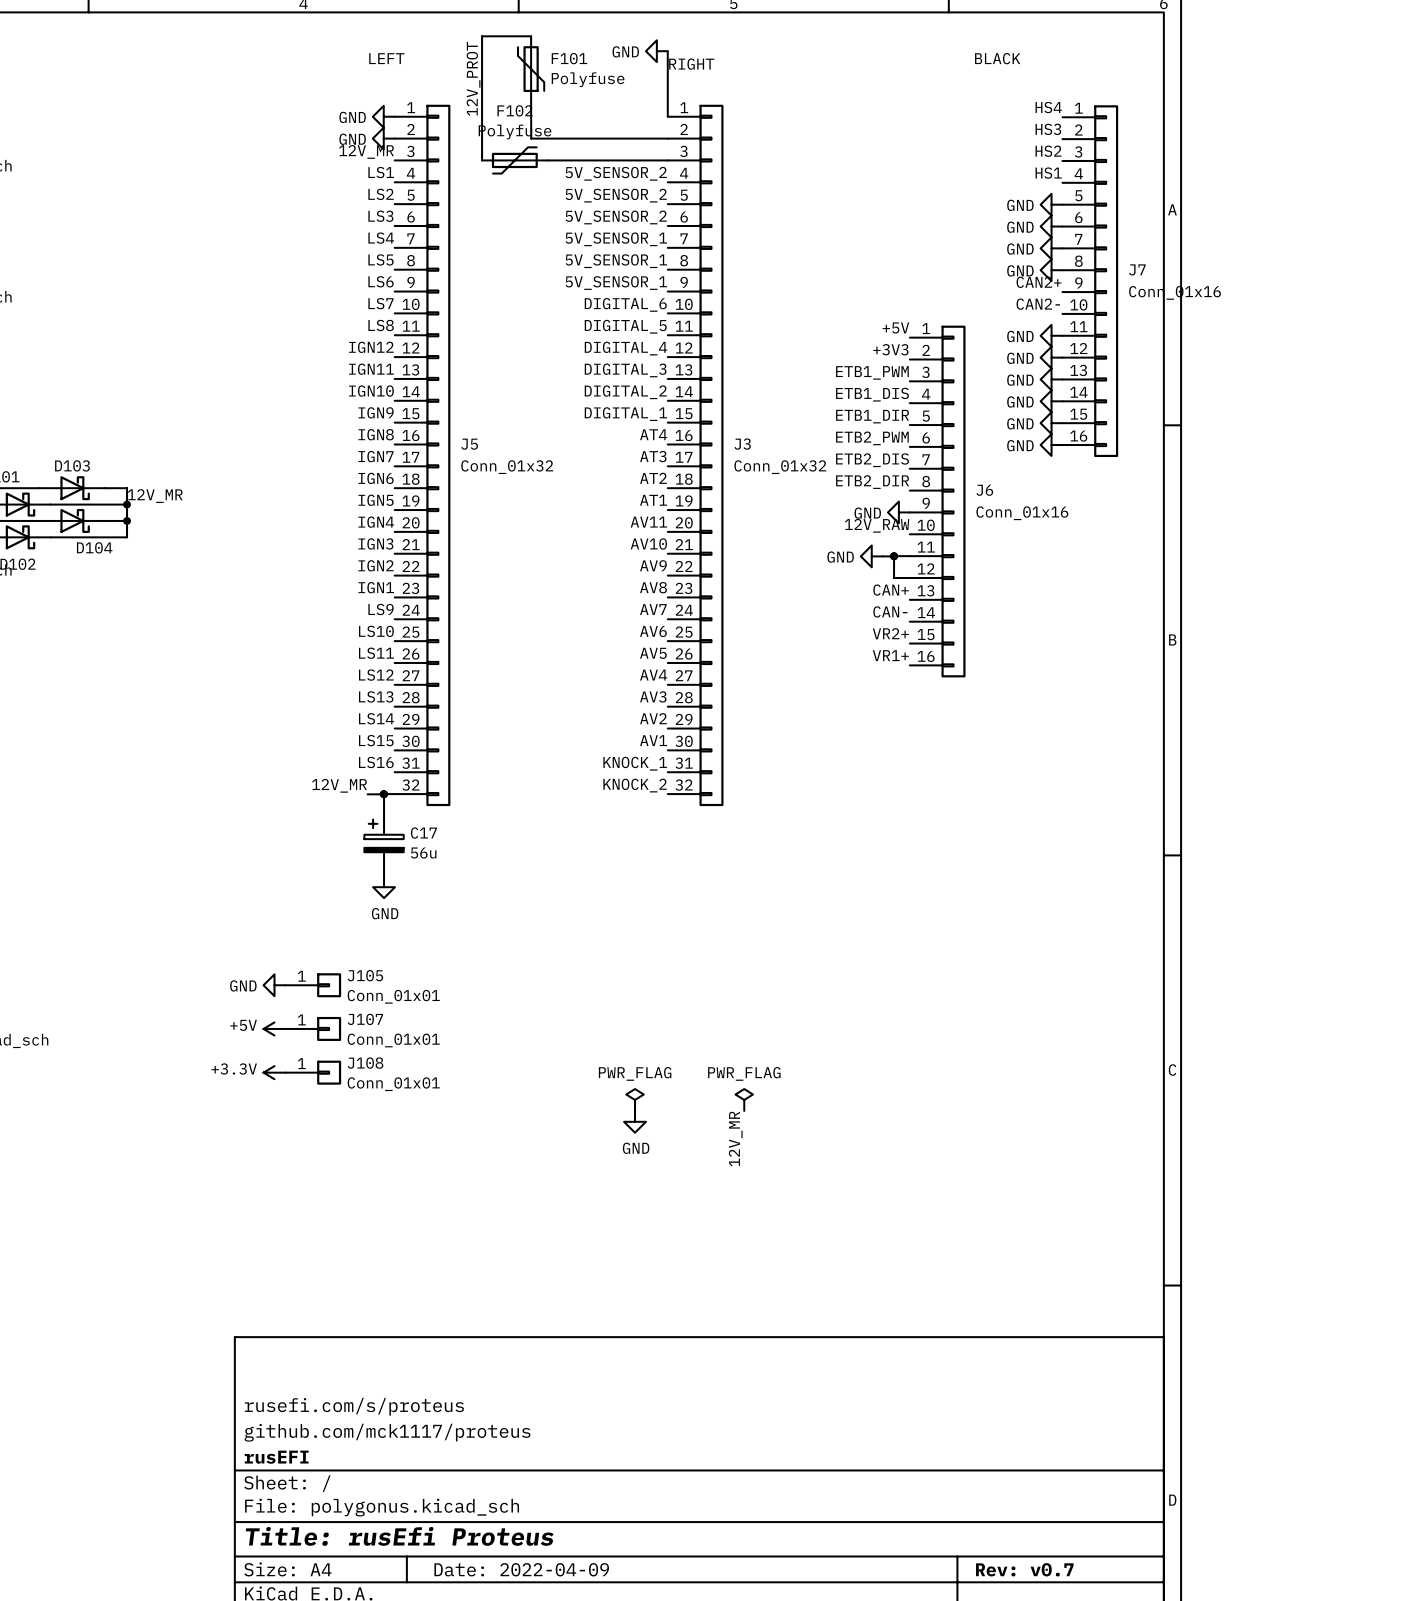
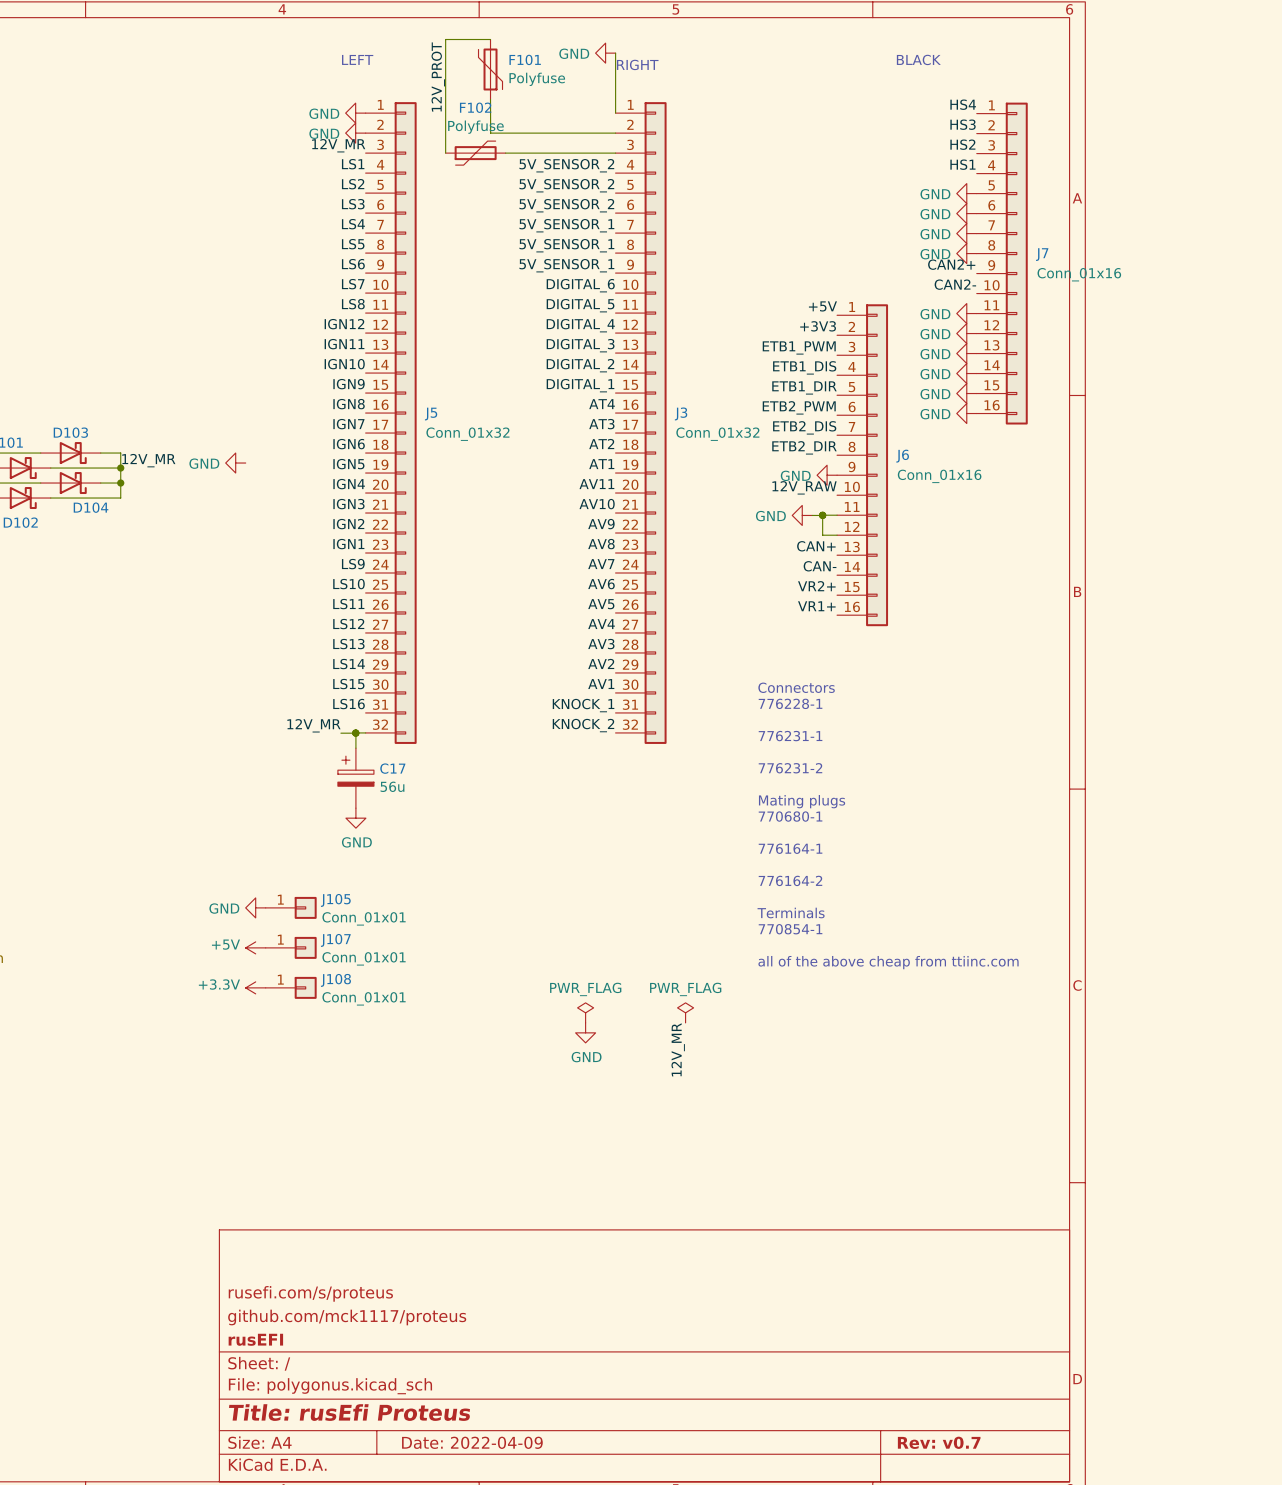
power symbol: none -> GND (235, 463)
text: none -> Connectors (796, 687)
text: none -> 776228-1 (790, 703)
text: none -> 776231-1 (790, 736)
text: none -> 776231-2 (790, 768)
text: none -> Mating plugs (802, 801)
text: none -> 770680-1 (790, 816)
text: none -> 776164-1 (790, 848)
text: none -> 776164-2 (790, 880)
text: none -> Terminals (791, 912)
text: none -> 770854-1 (790, 929)
text: none -> all of the above cheap from ttiinc.com (888, 962)

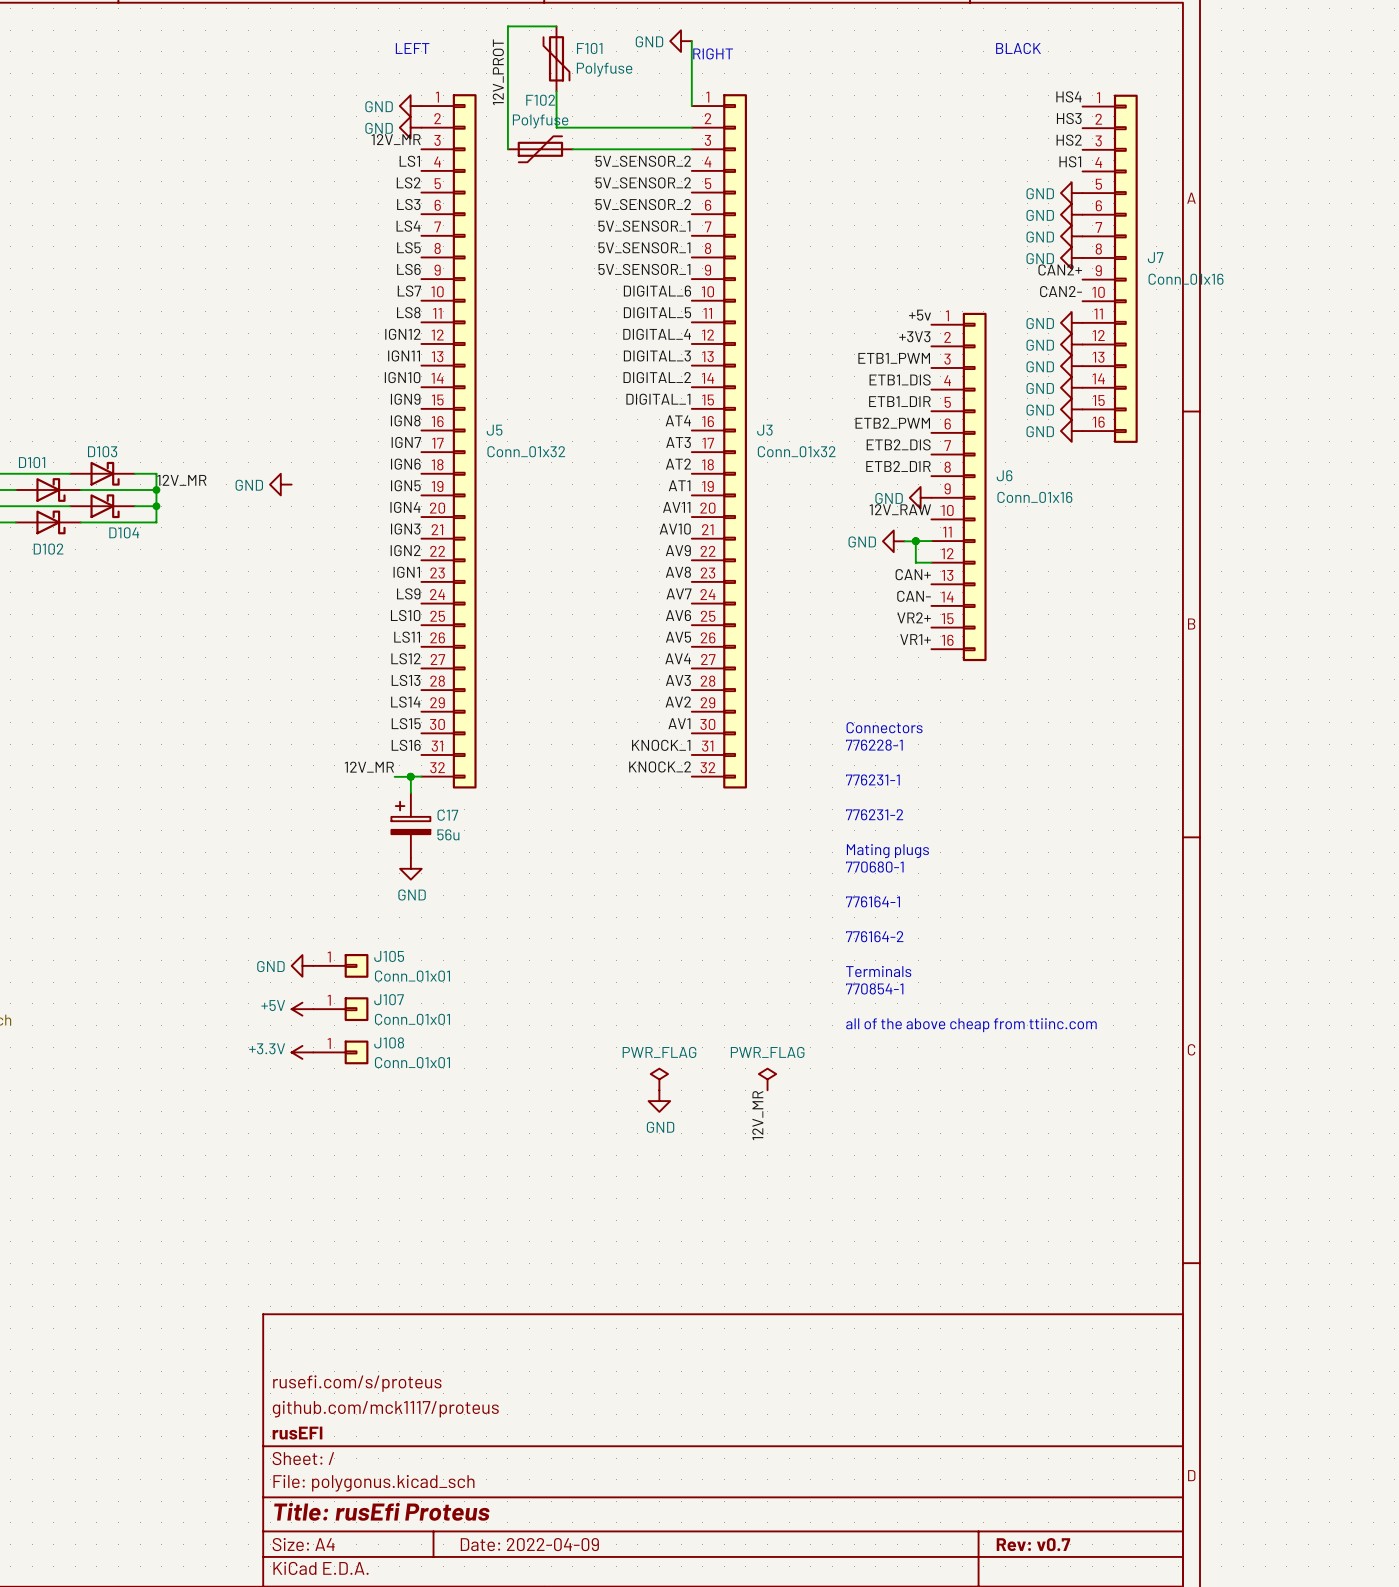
label: +5V (822, 306) -> +5v (920, 315)

